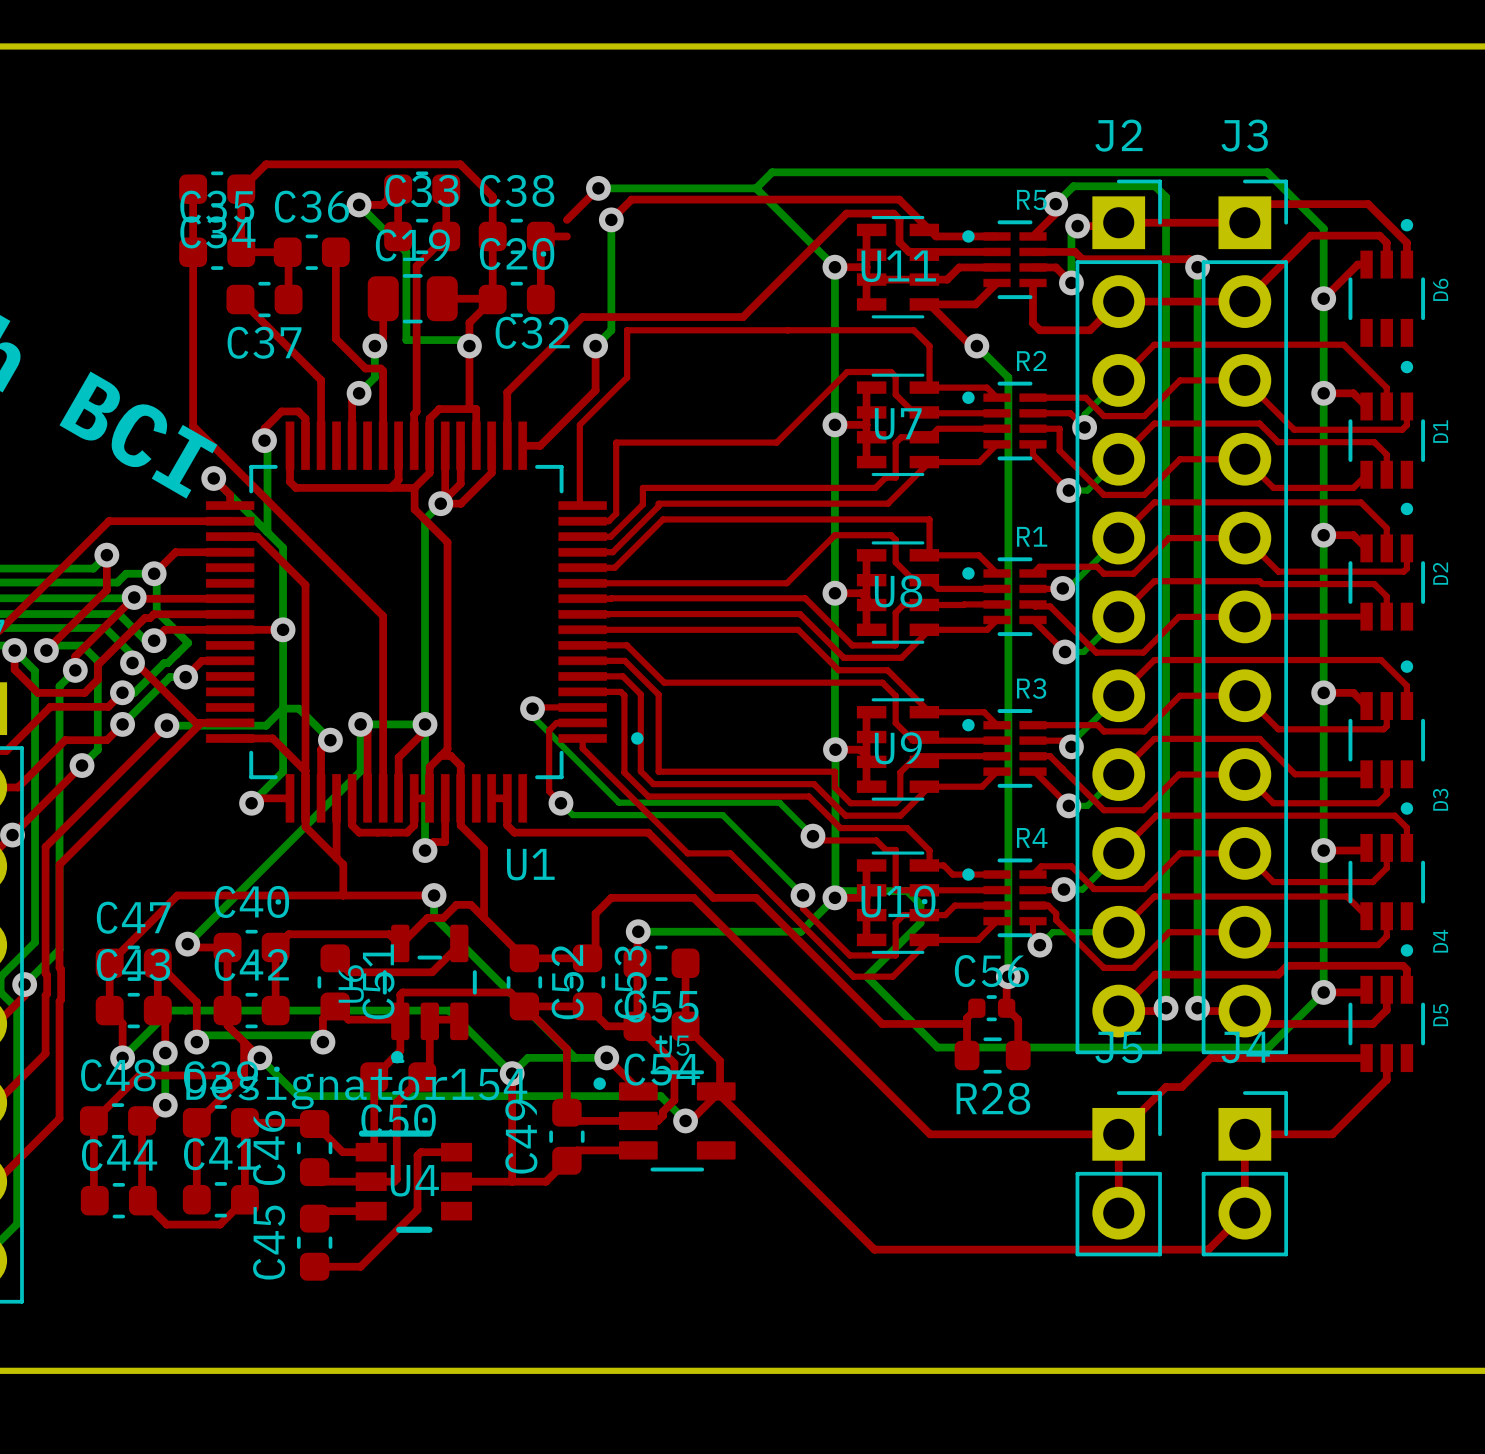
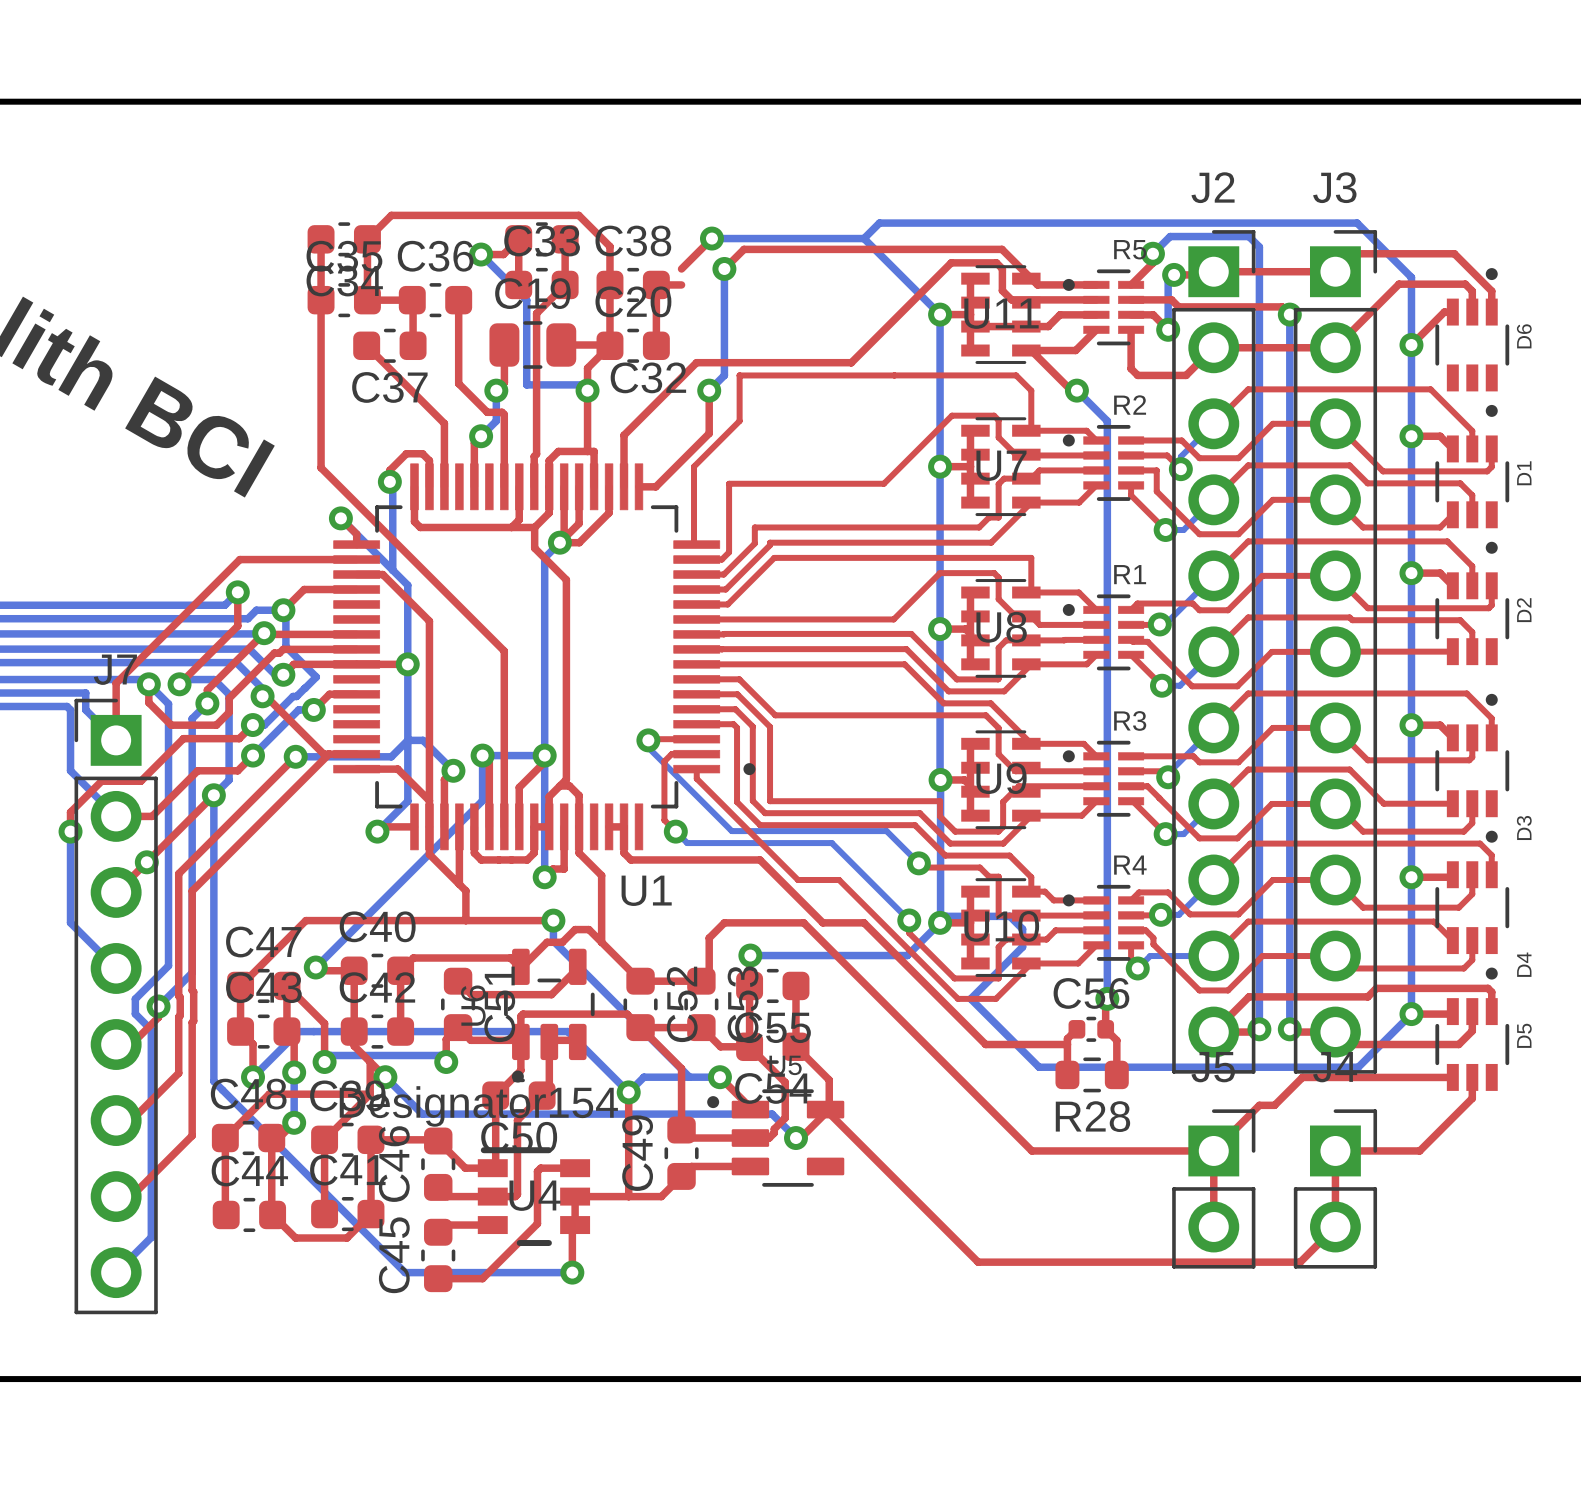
bottom track: none -> (213, 795) (213, 1081) (405, 1272) (572, 1272)
top track: none -> (575, 1196) (575, 1225) (572, 1227) (572, 1272)
via: none -> (572, 1272)

